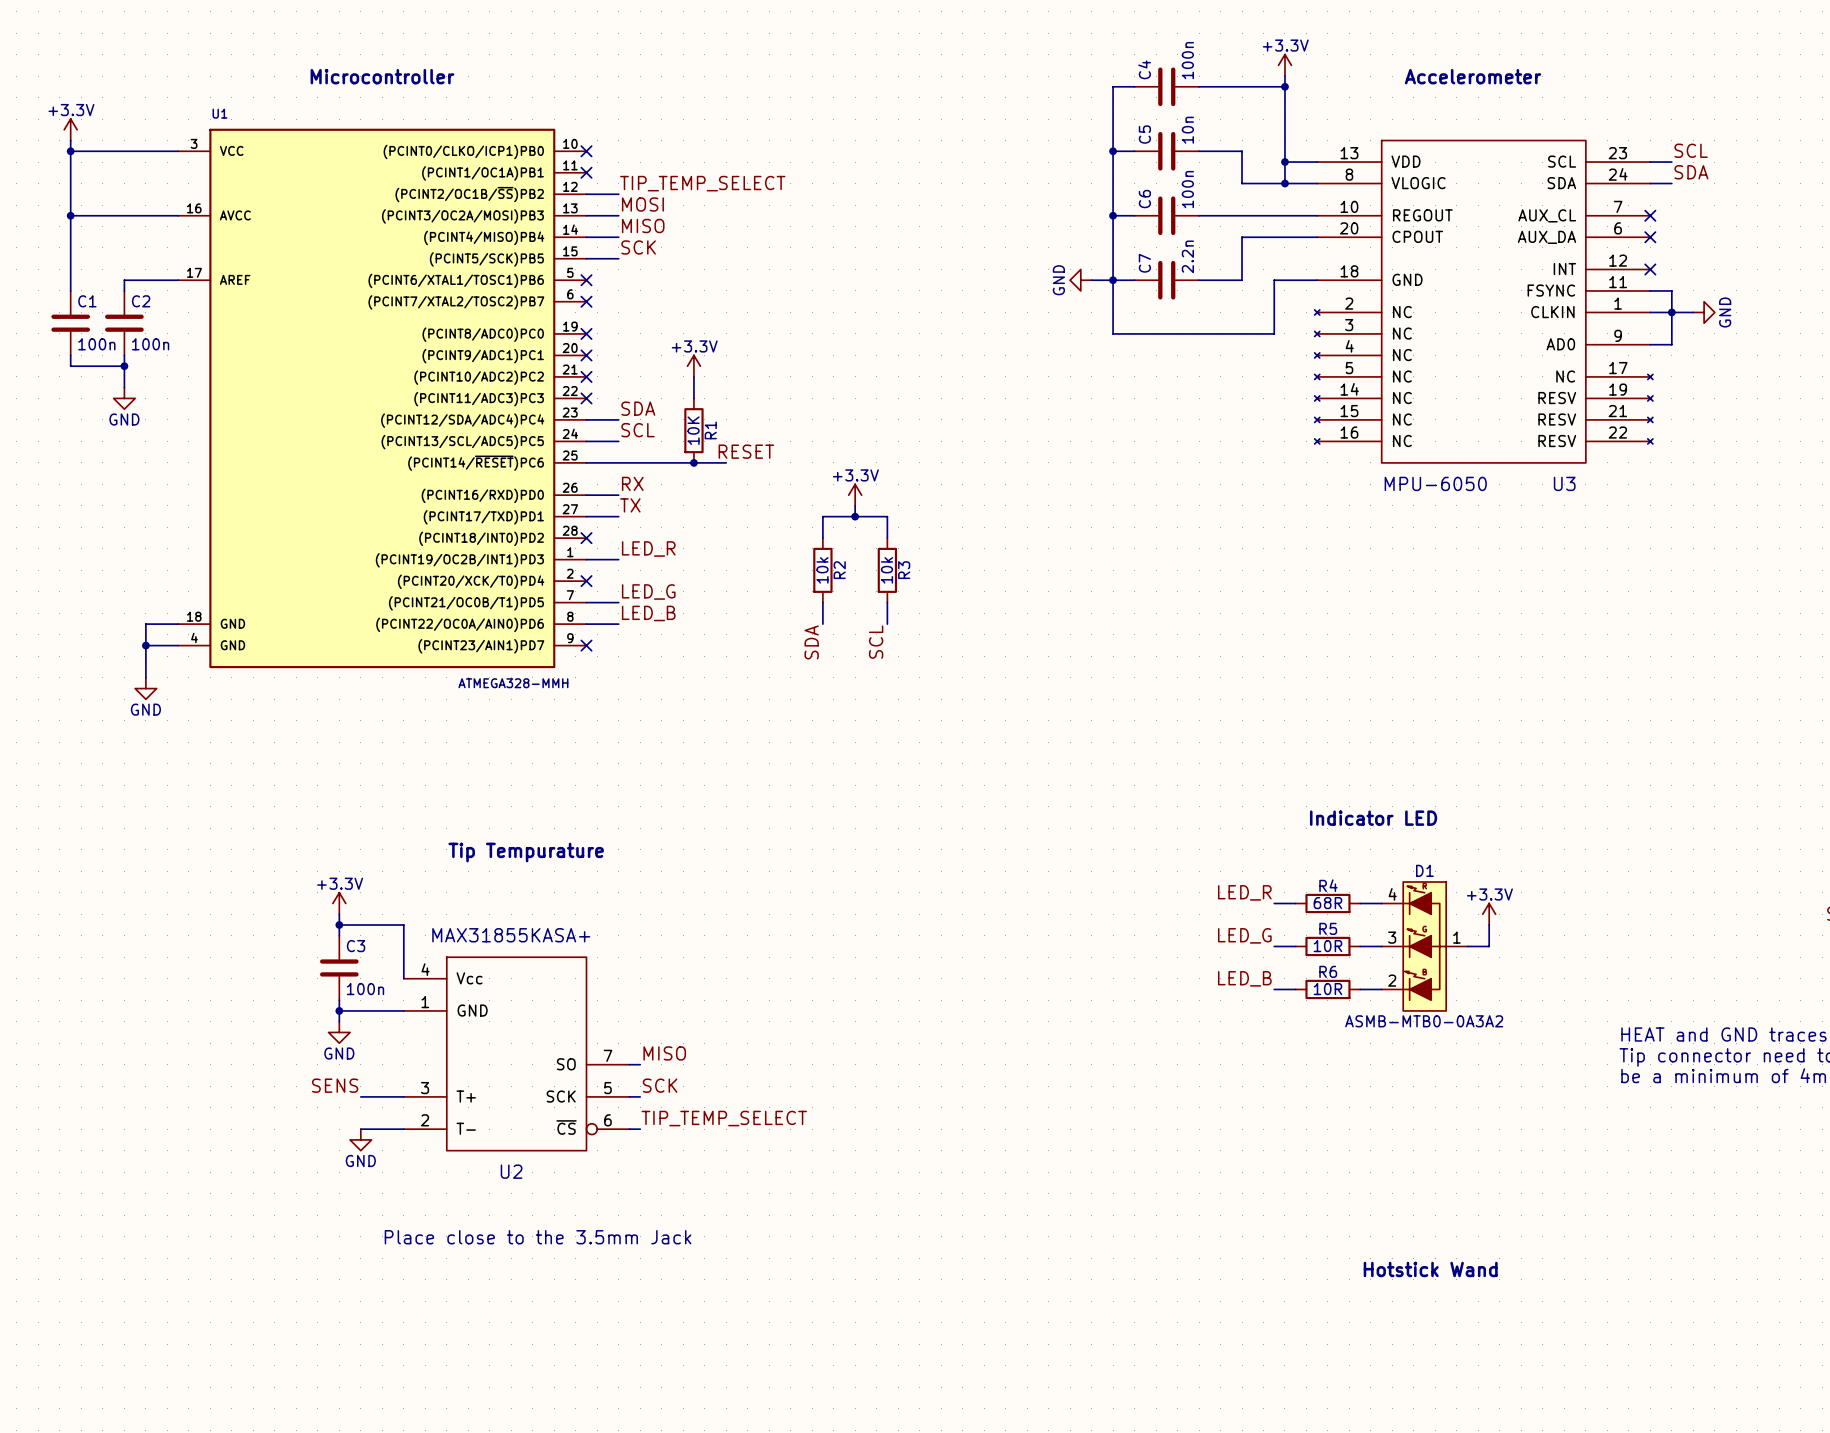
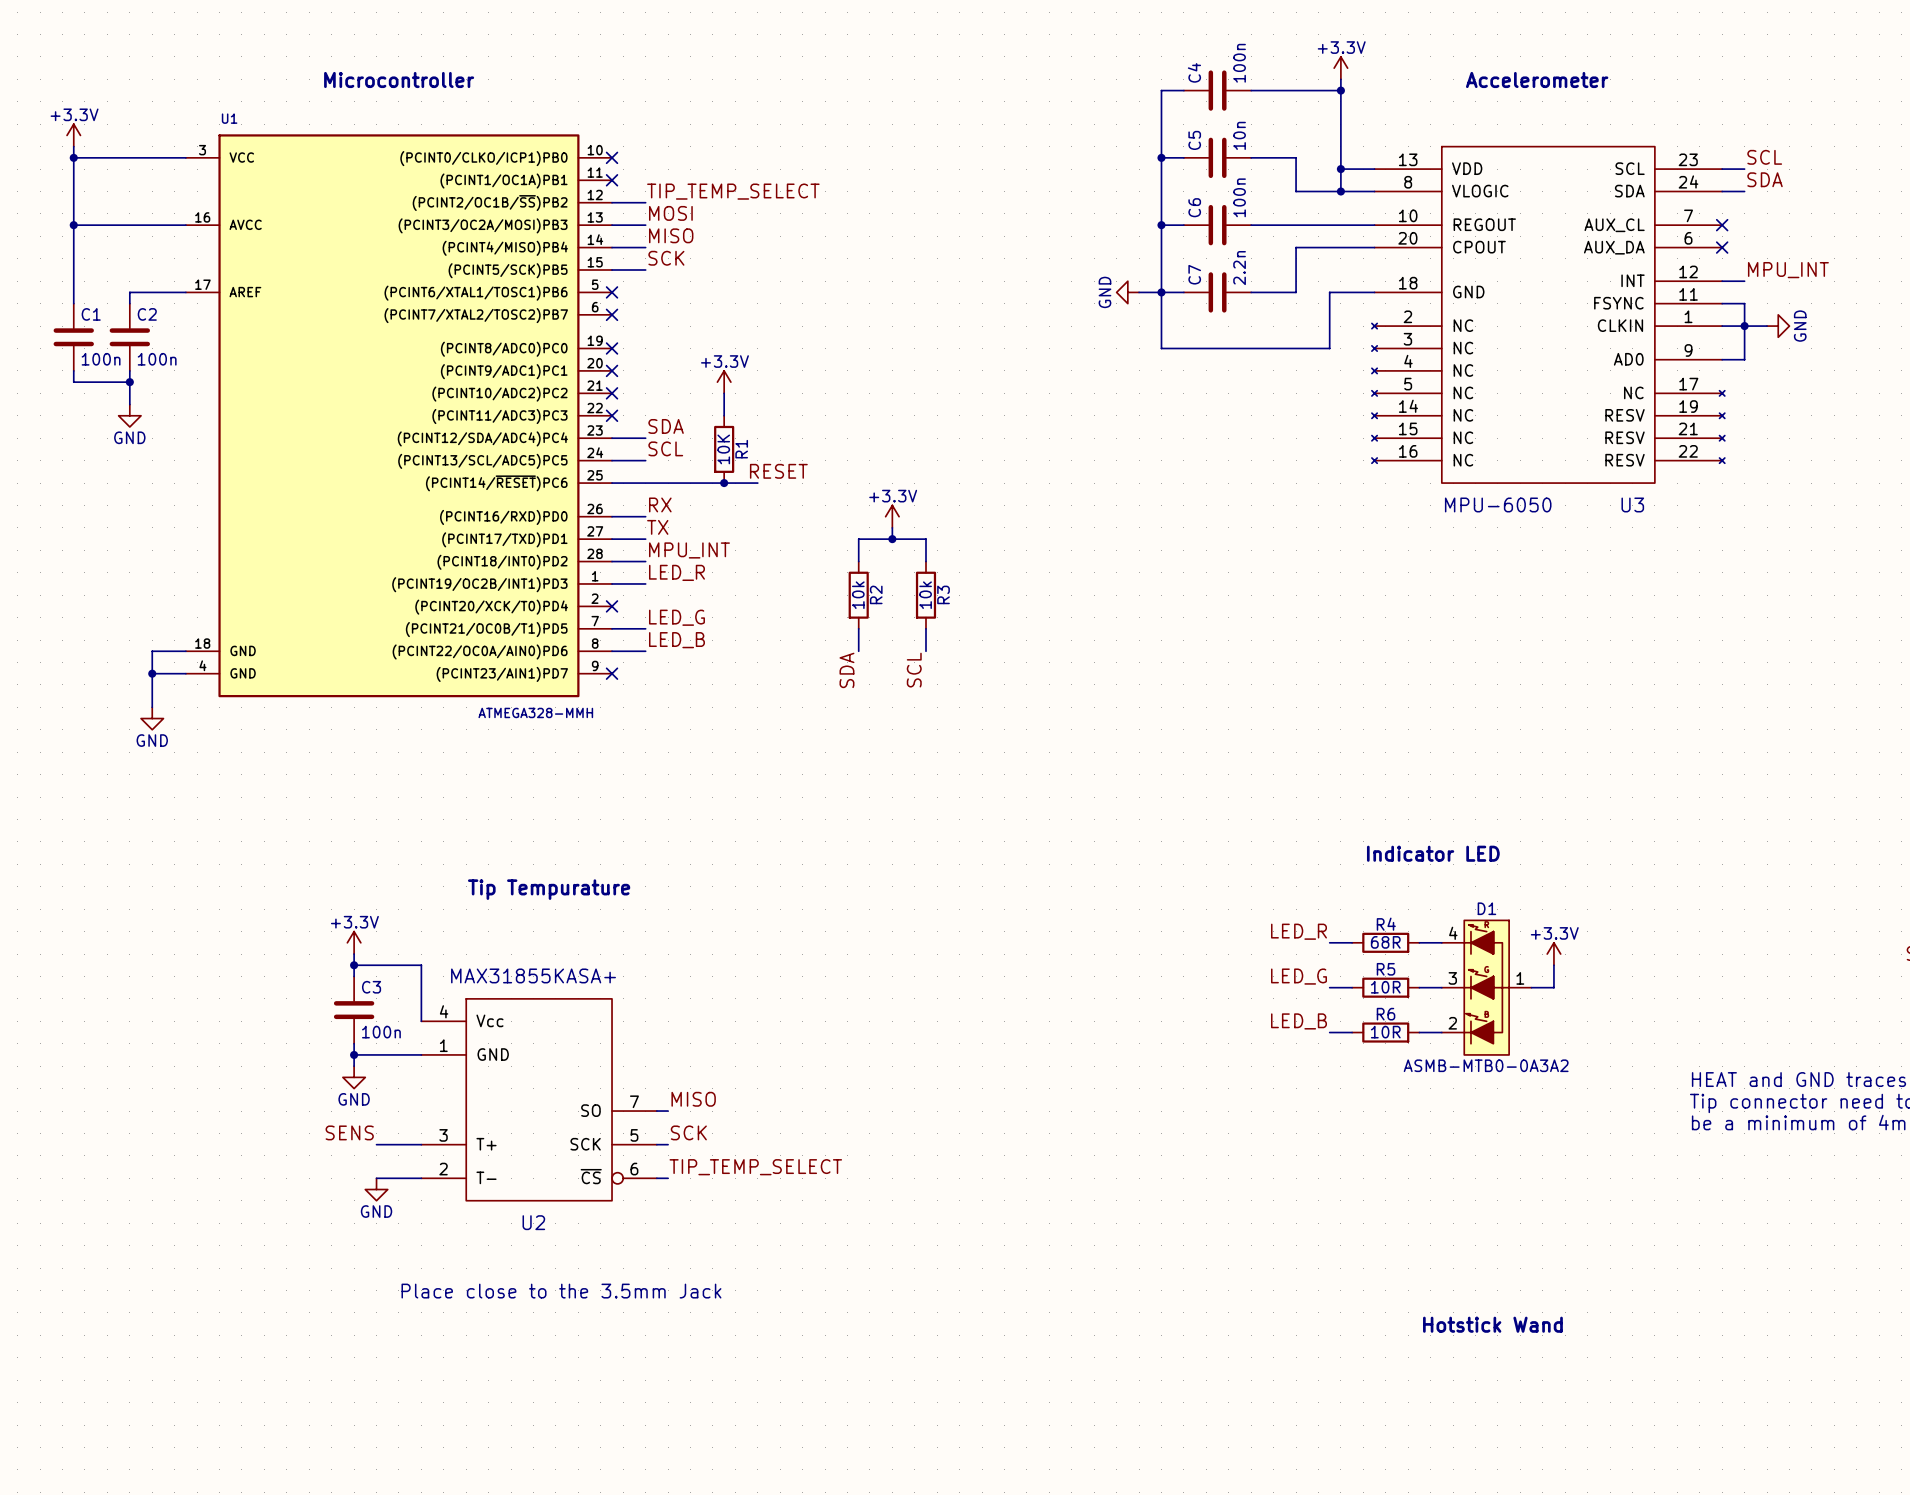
label: none -> MPU_INT (1788, 270)
wire: none -> (1722, 281) (1744, 281)
no-connect mark: (1650, 269) -> none
label: none -> MPU_INT (689, 550)
wire: none -> (612, 561) (645, 561)
no-connect mark: (586, 538) -> none

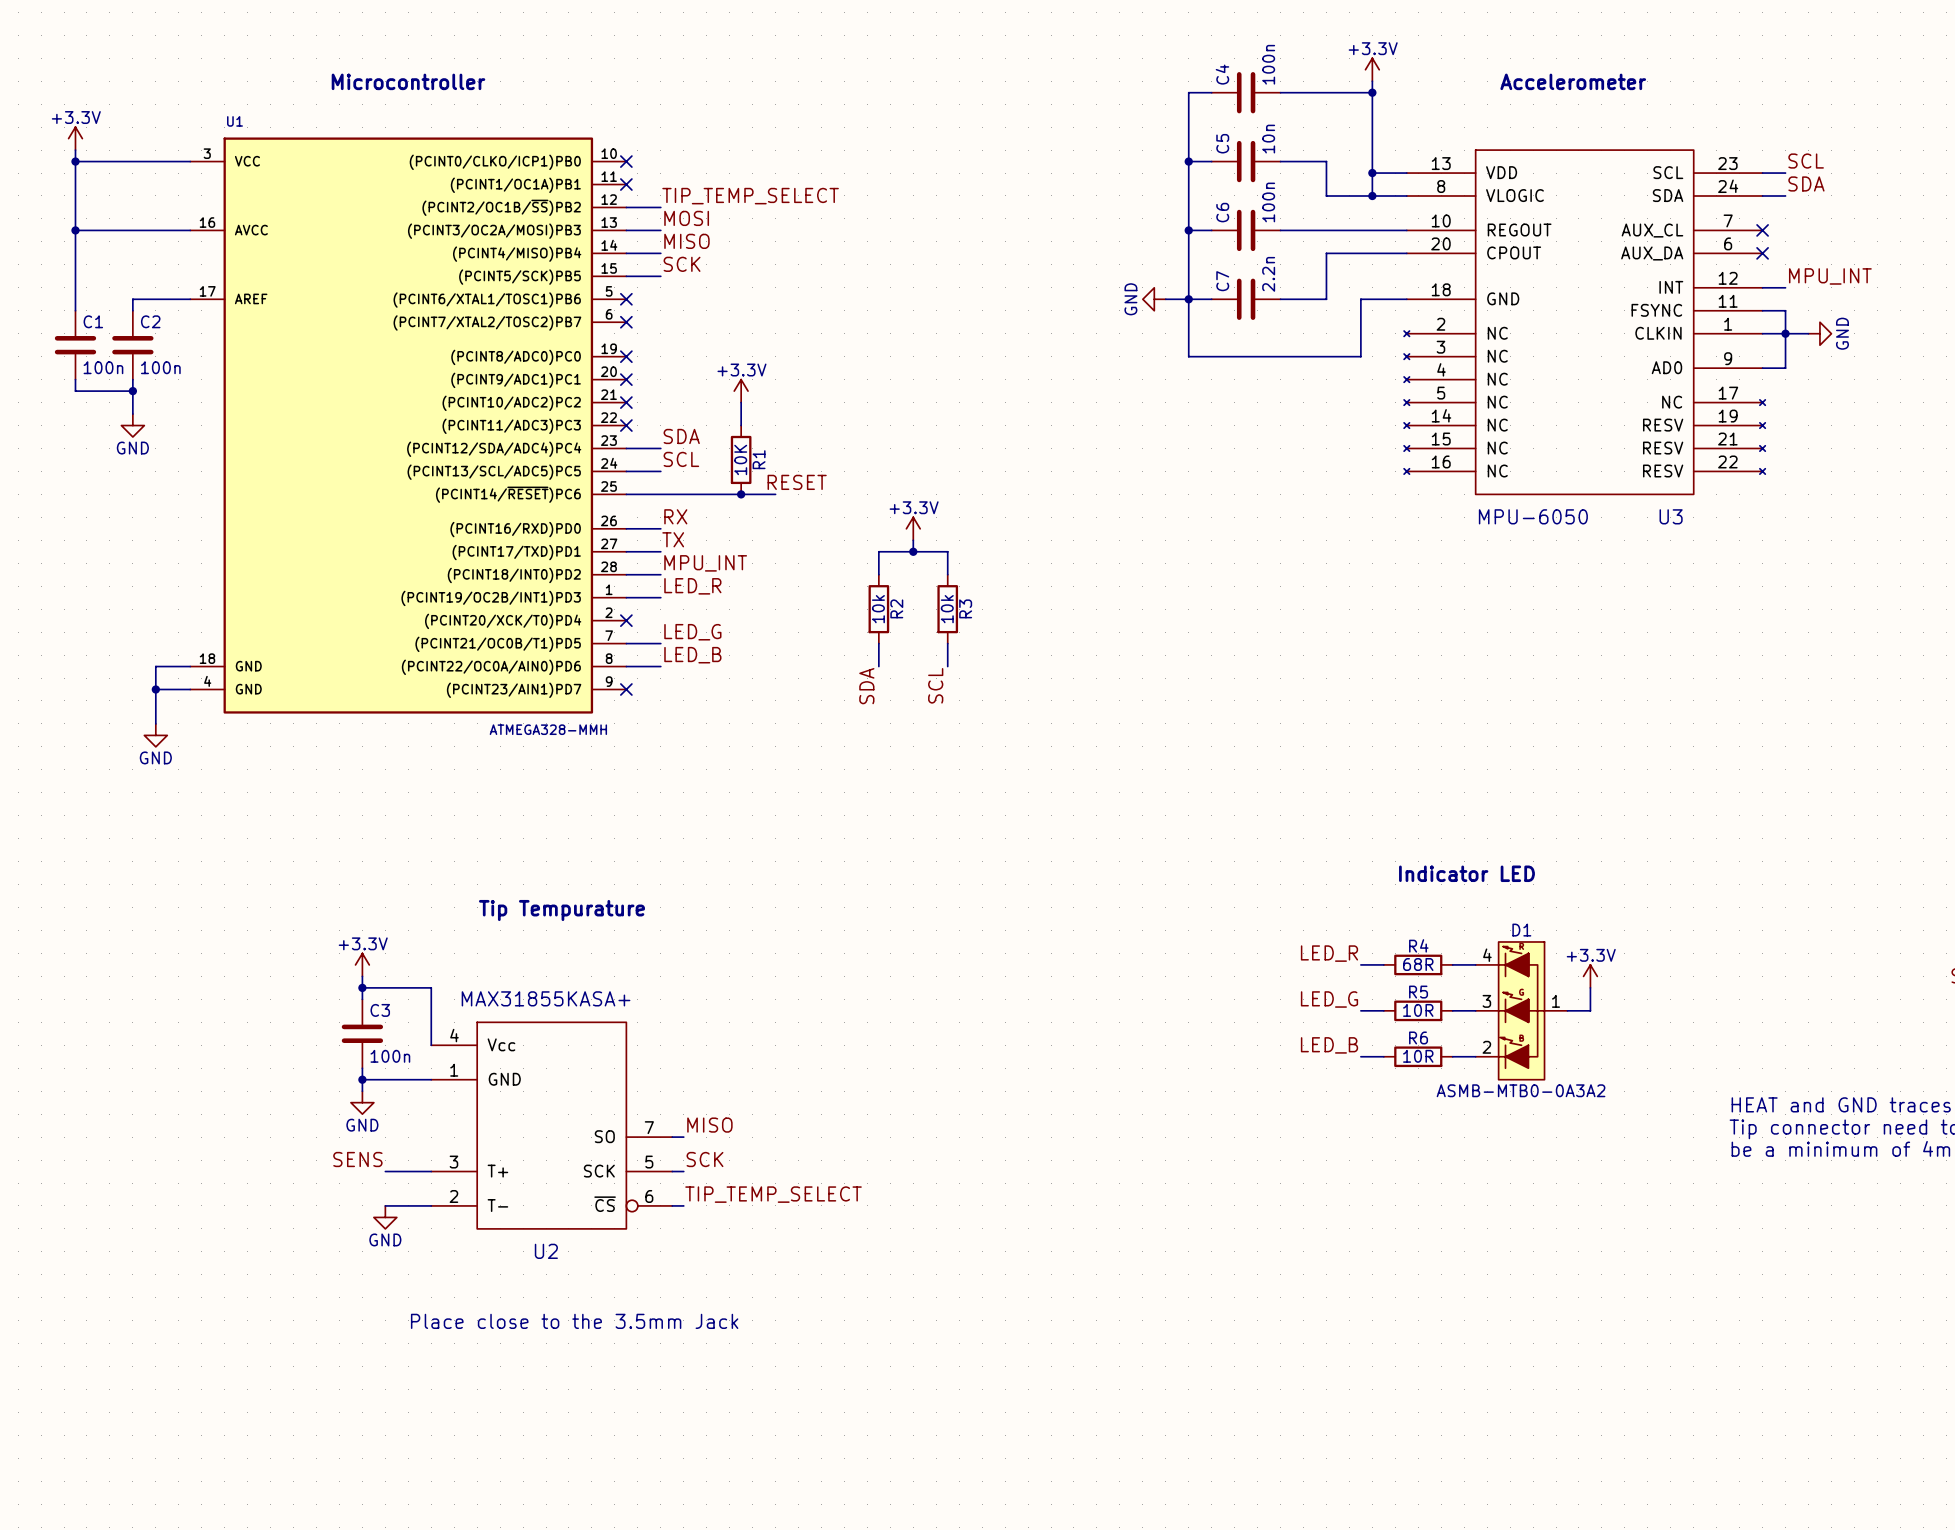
text: Hotstick Wand (1492, 1324) -> none

